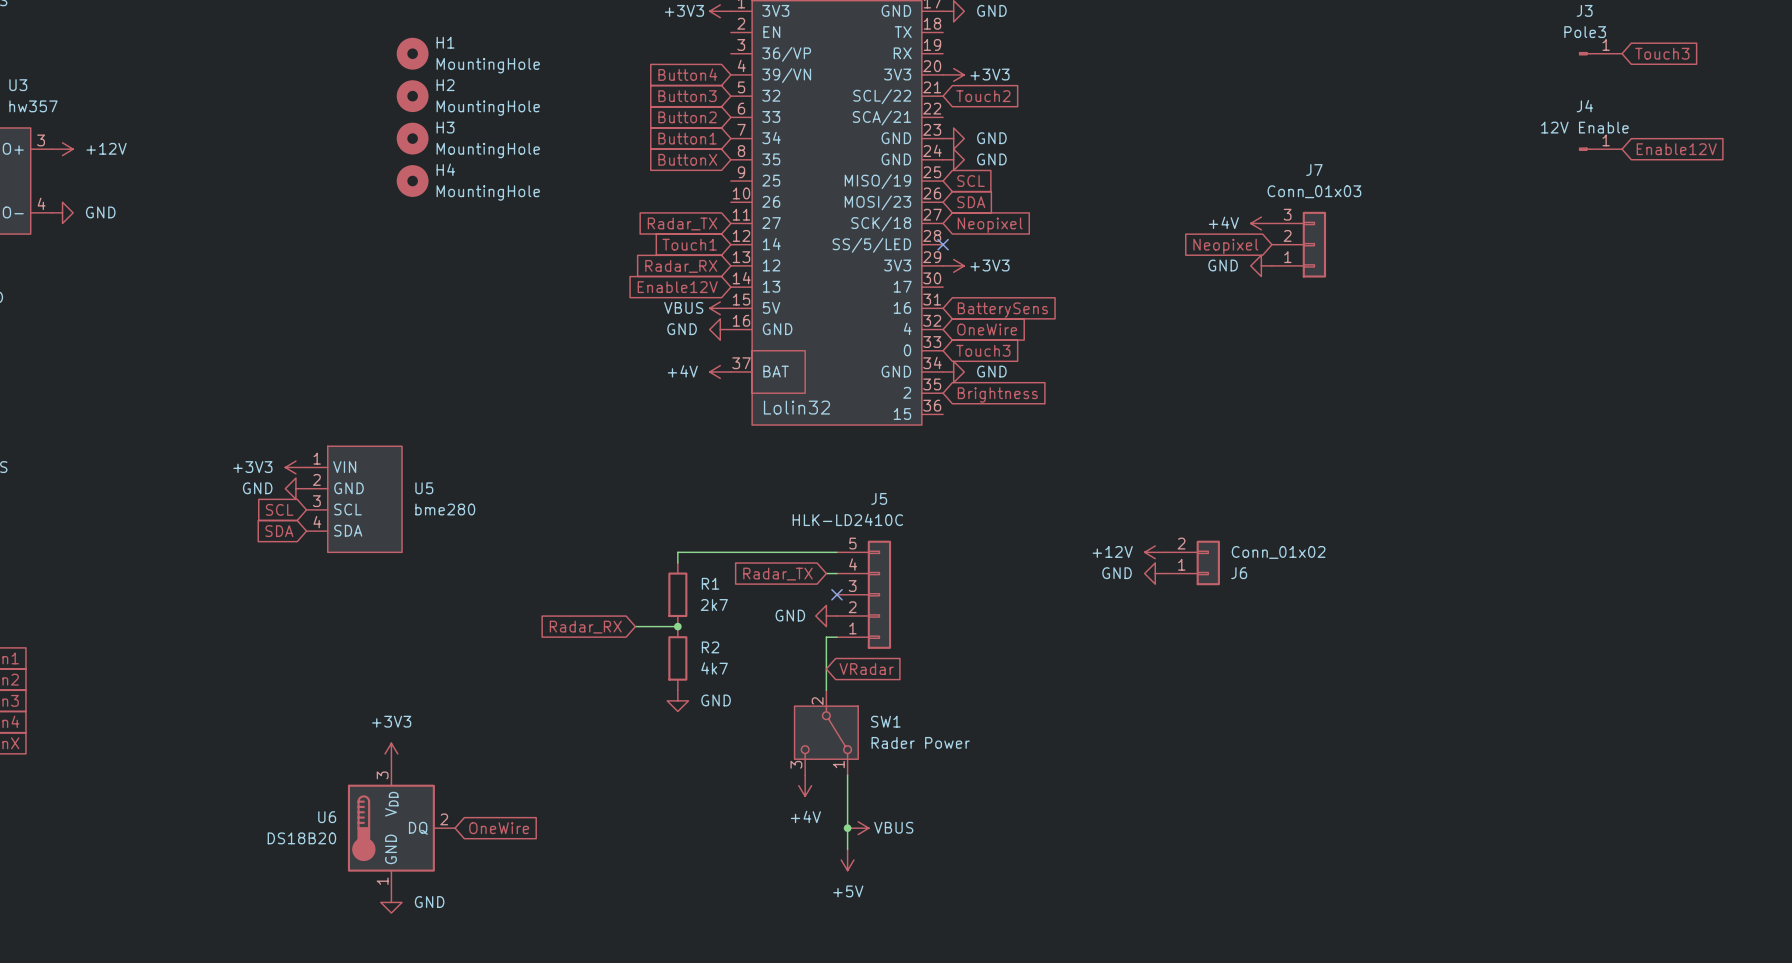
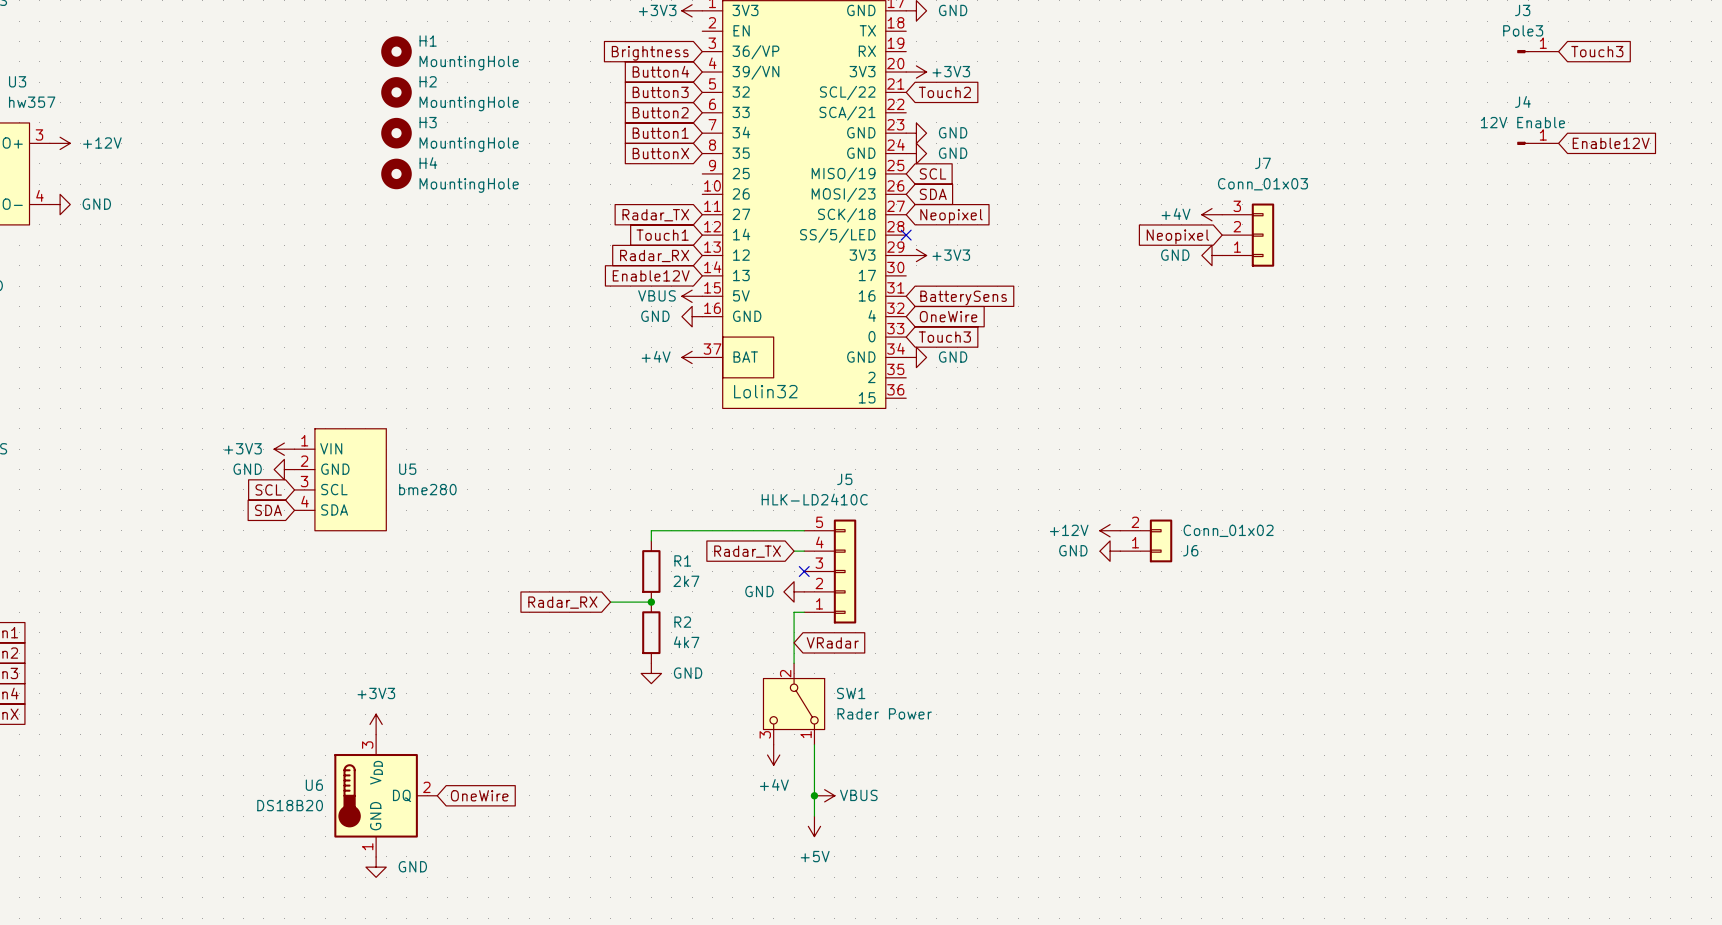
global label: none -> Brightness (650, 53)
global label: Brightness (997, 394) -> none

